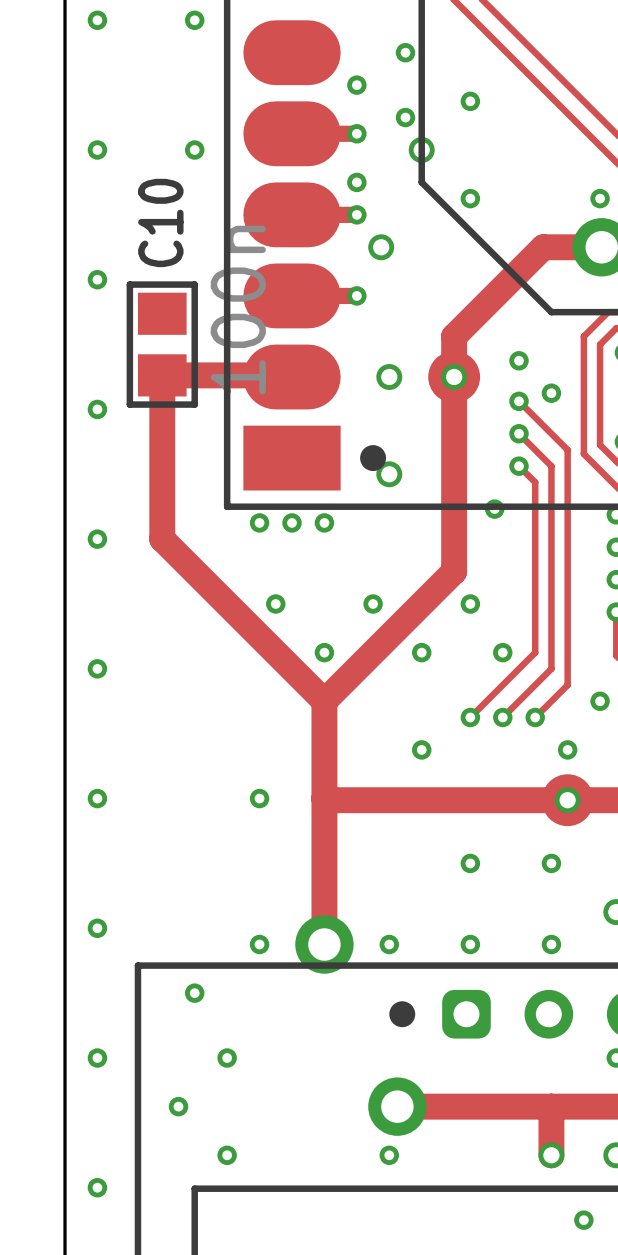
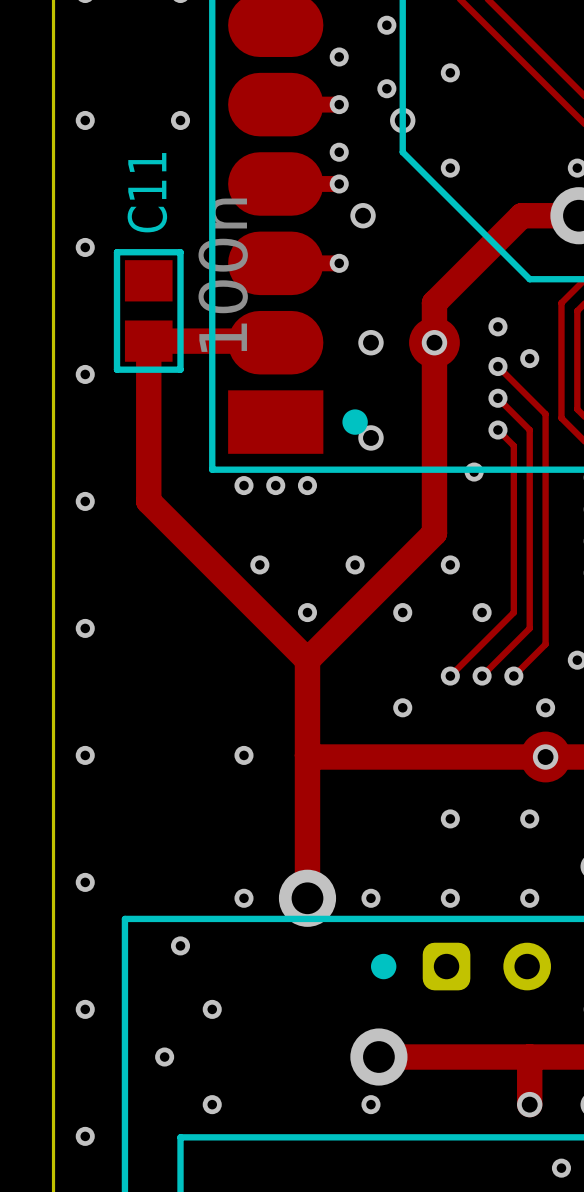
C10 name: C10 (160, 222) -> C11 (147, 192)

